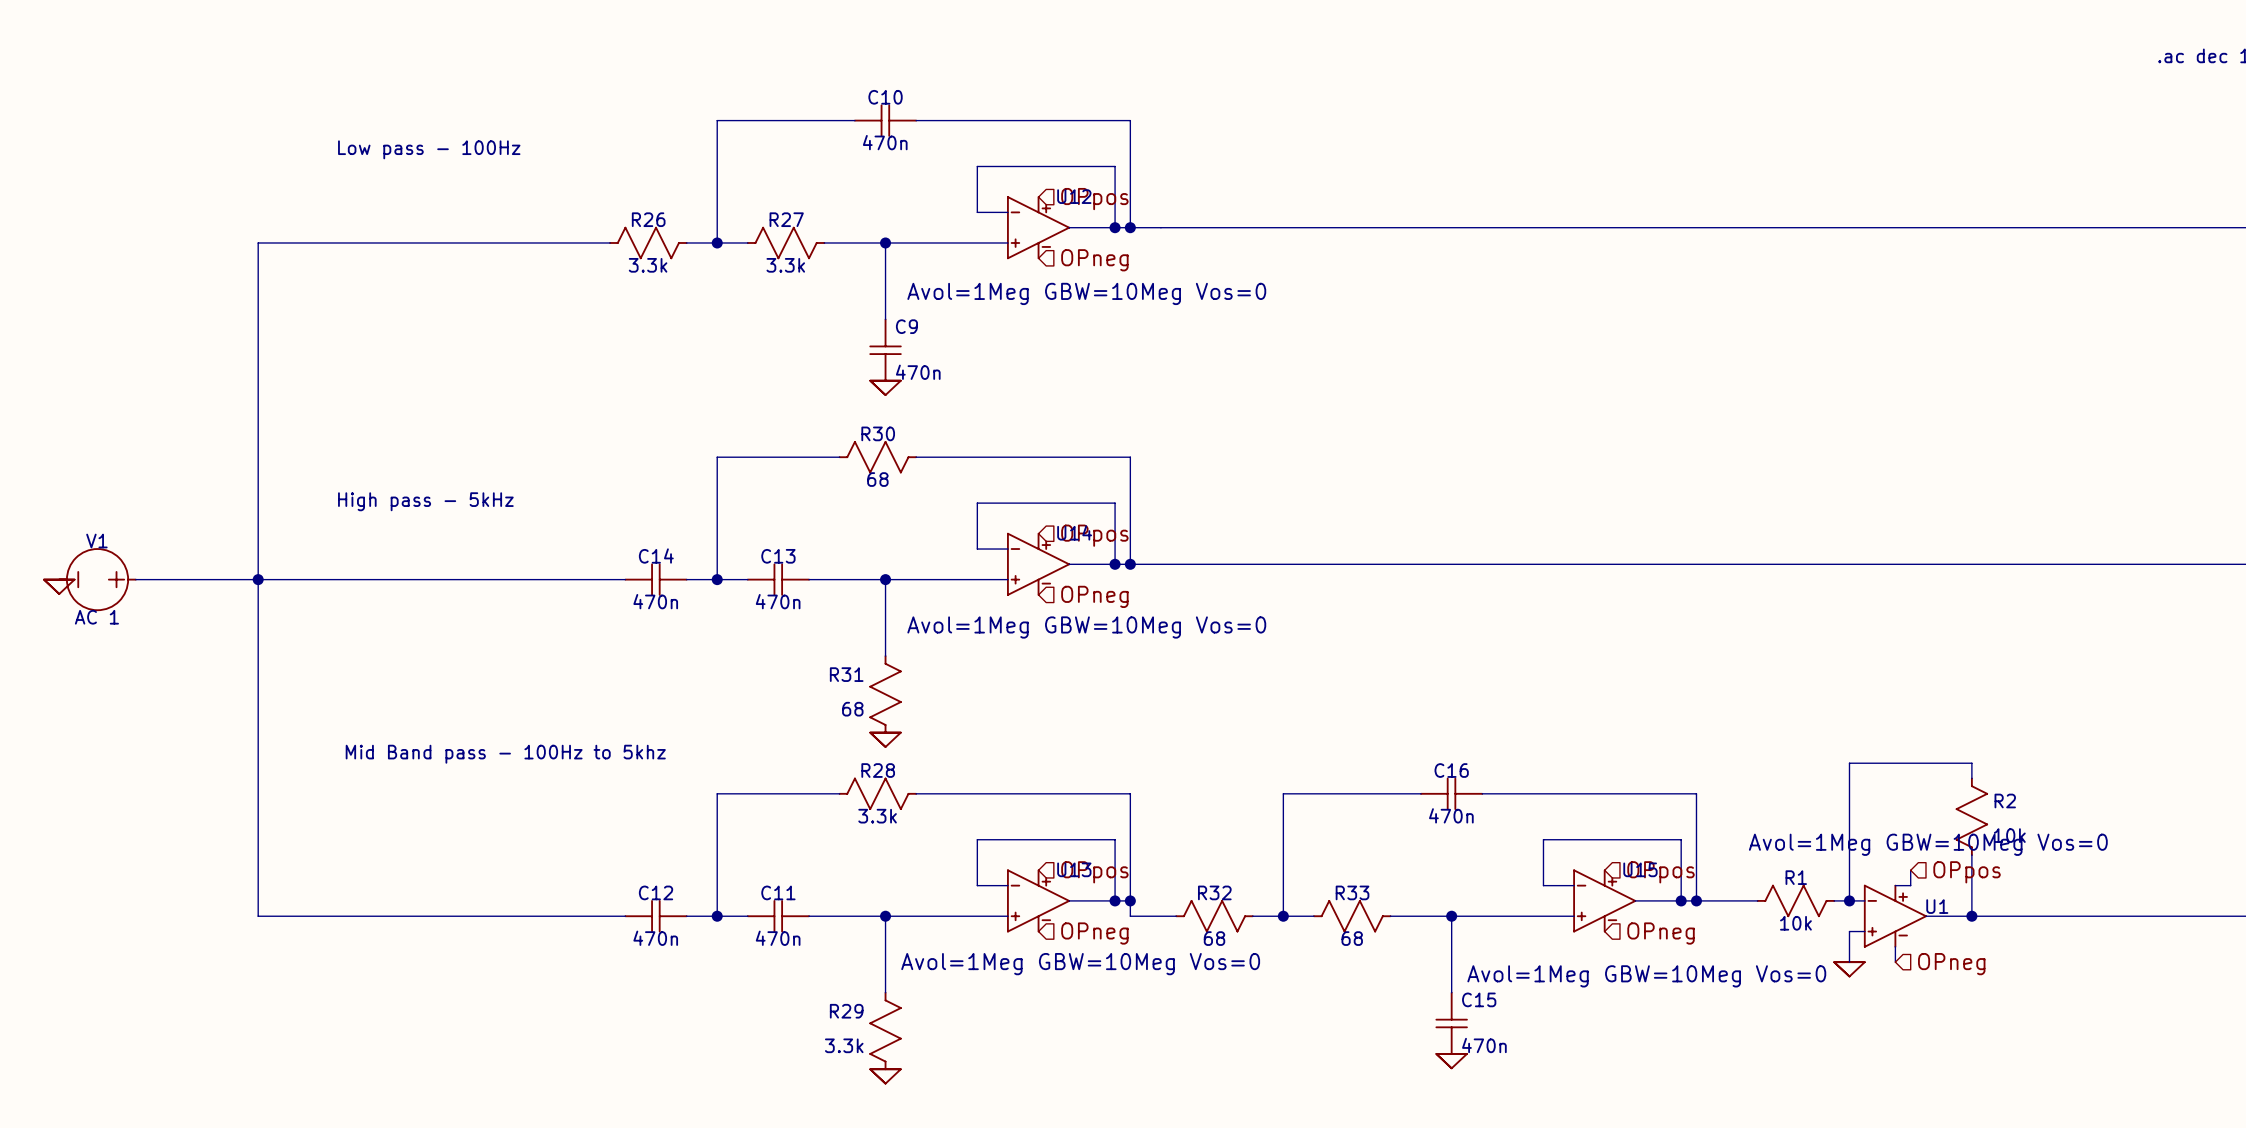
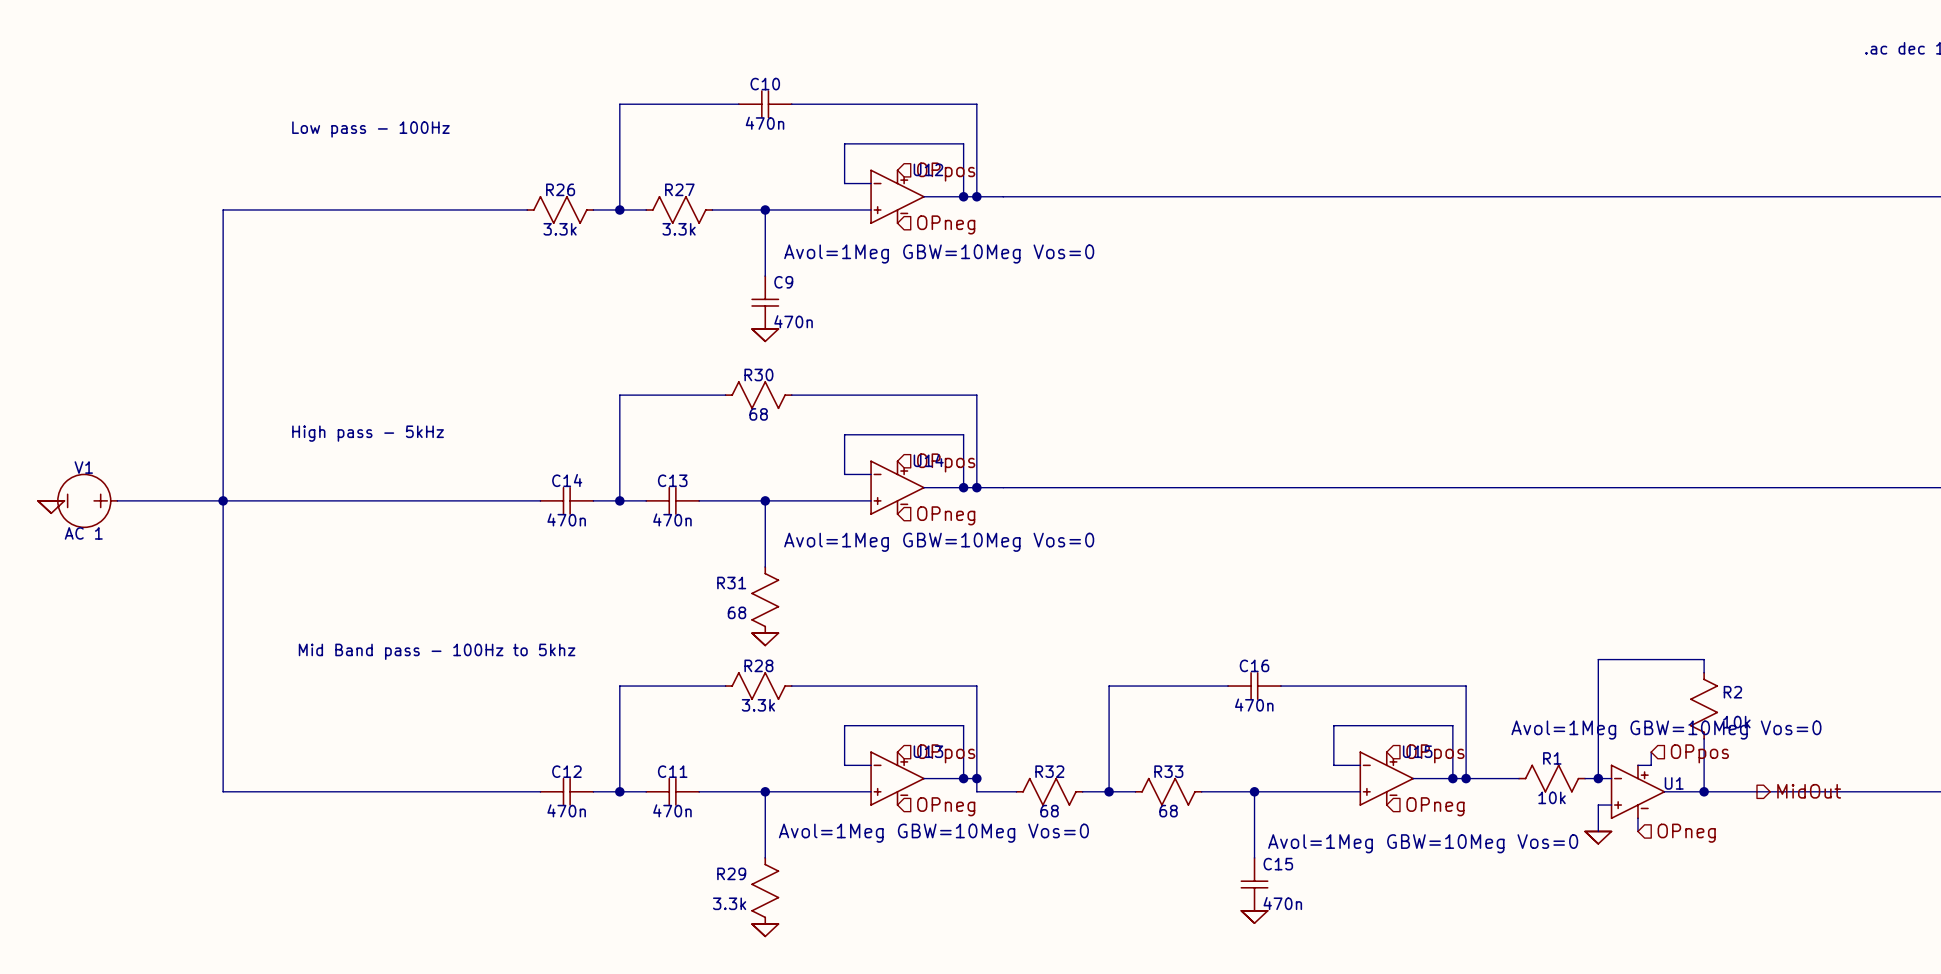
hierarchical label: none -> MidOut (1809, 791)

